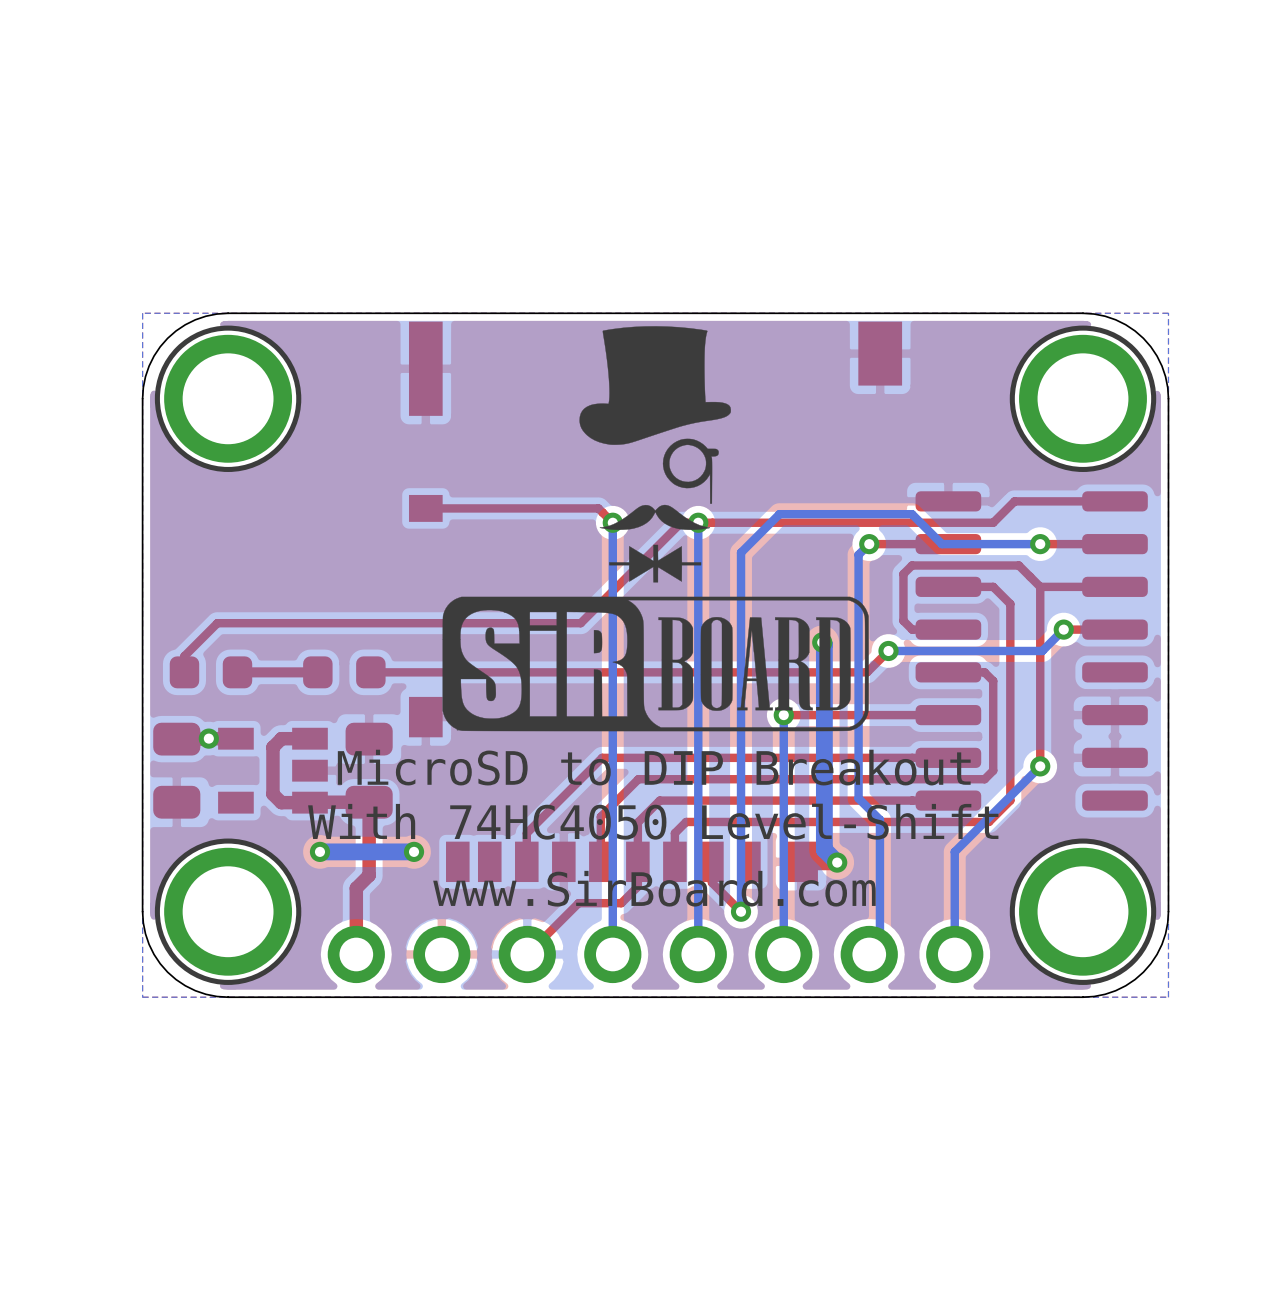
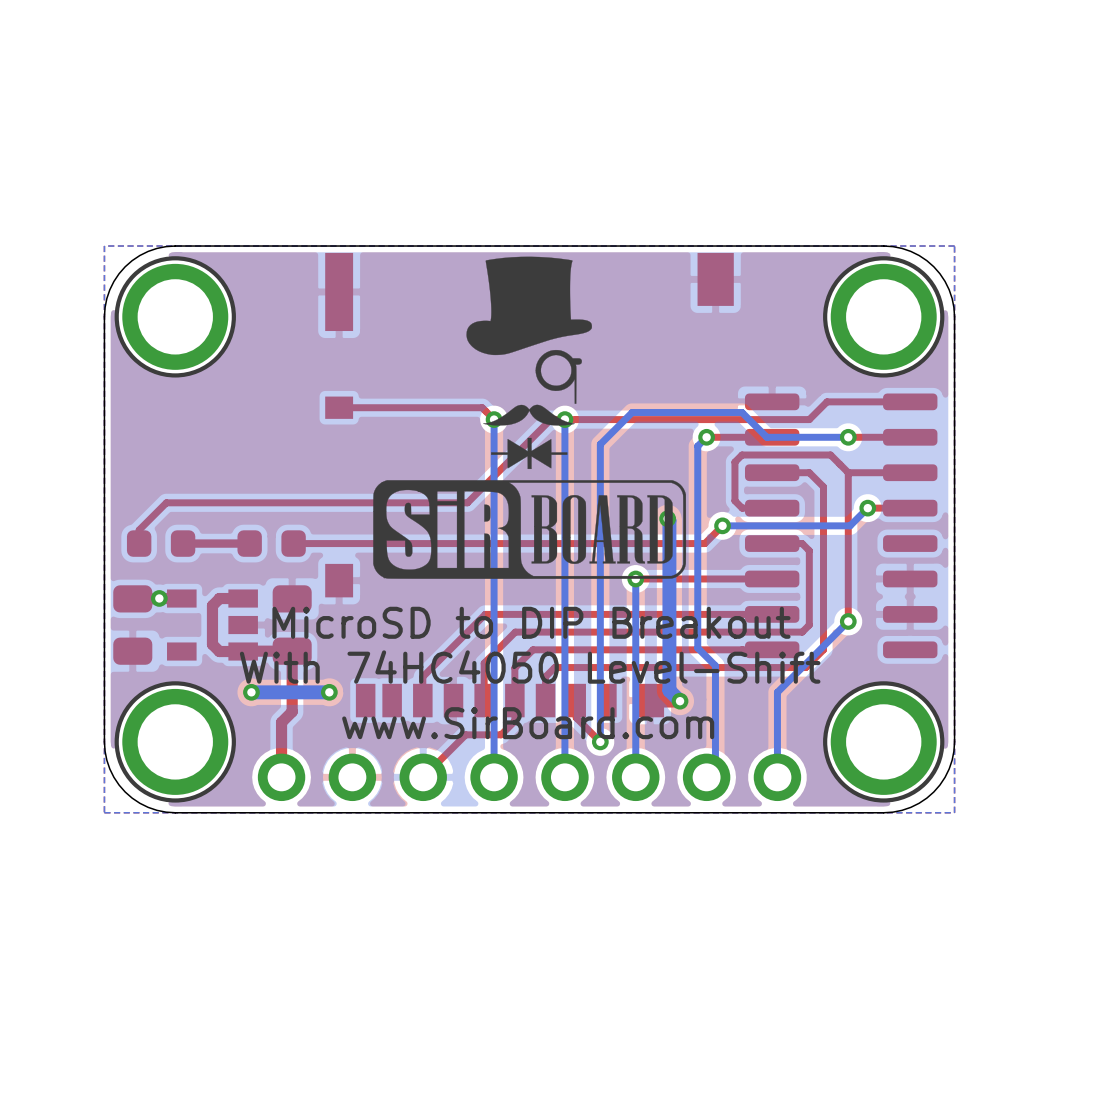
drawing shape: [442, 596, 869, 732] -> [373, 480, 687, 579]

